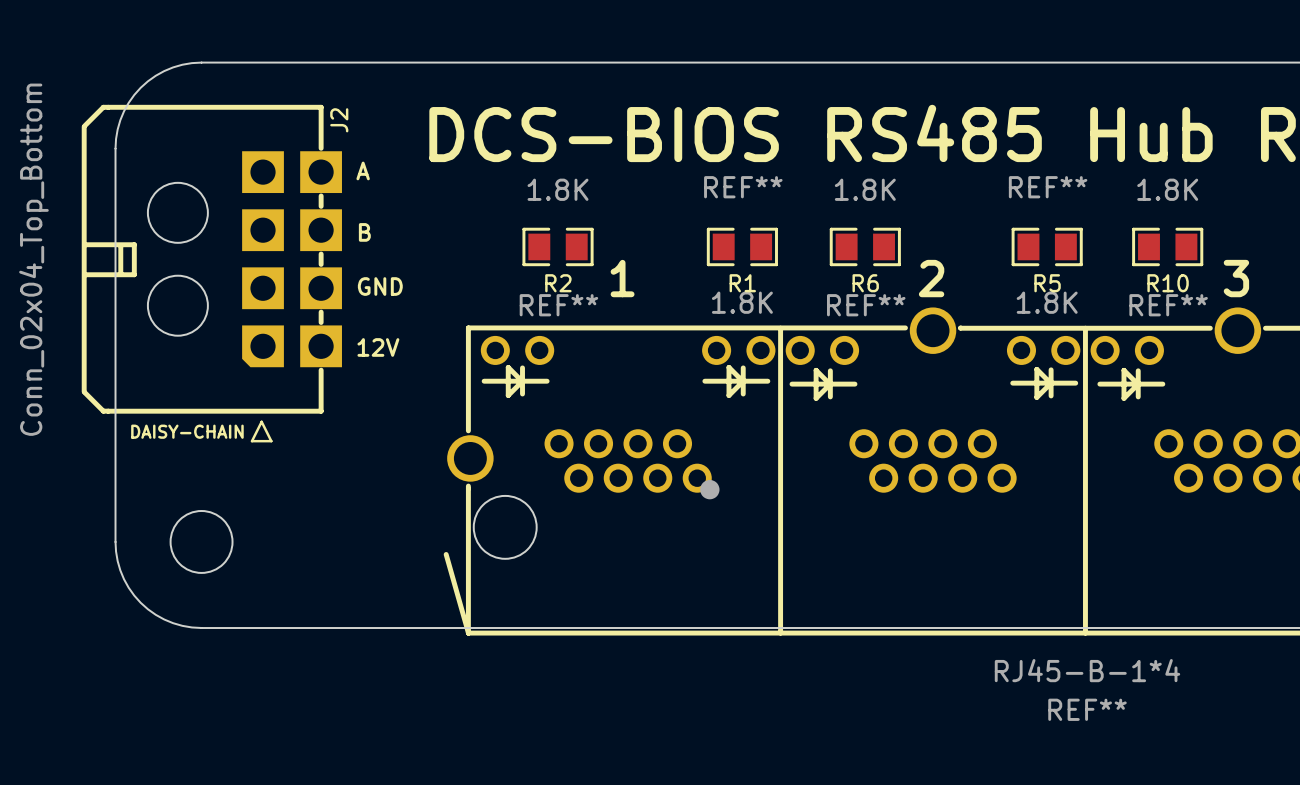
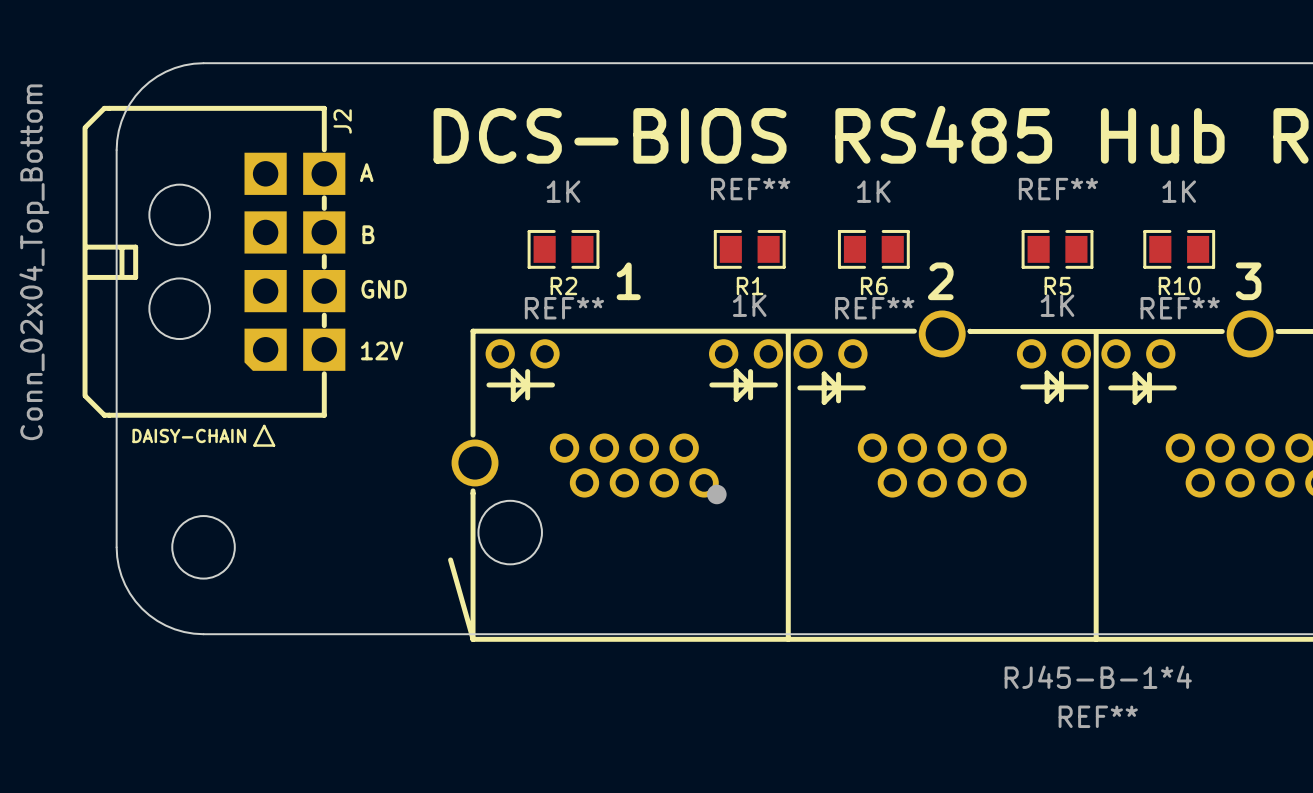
R2 value: 1.8K (558, 189) -> 1K (563, 191)
R6 value: 1.8K (865, 189) -> 1K (873, 191)
R10 value: 1.8K (1167, 189) -> 1K (1179, 191)
R1 value: 1.8K (742, 302) -> 1K (749, 305)
R5 value: 1.8K (1047, 302) -> 1K (1057, 305)

